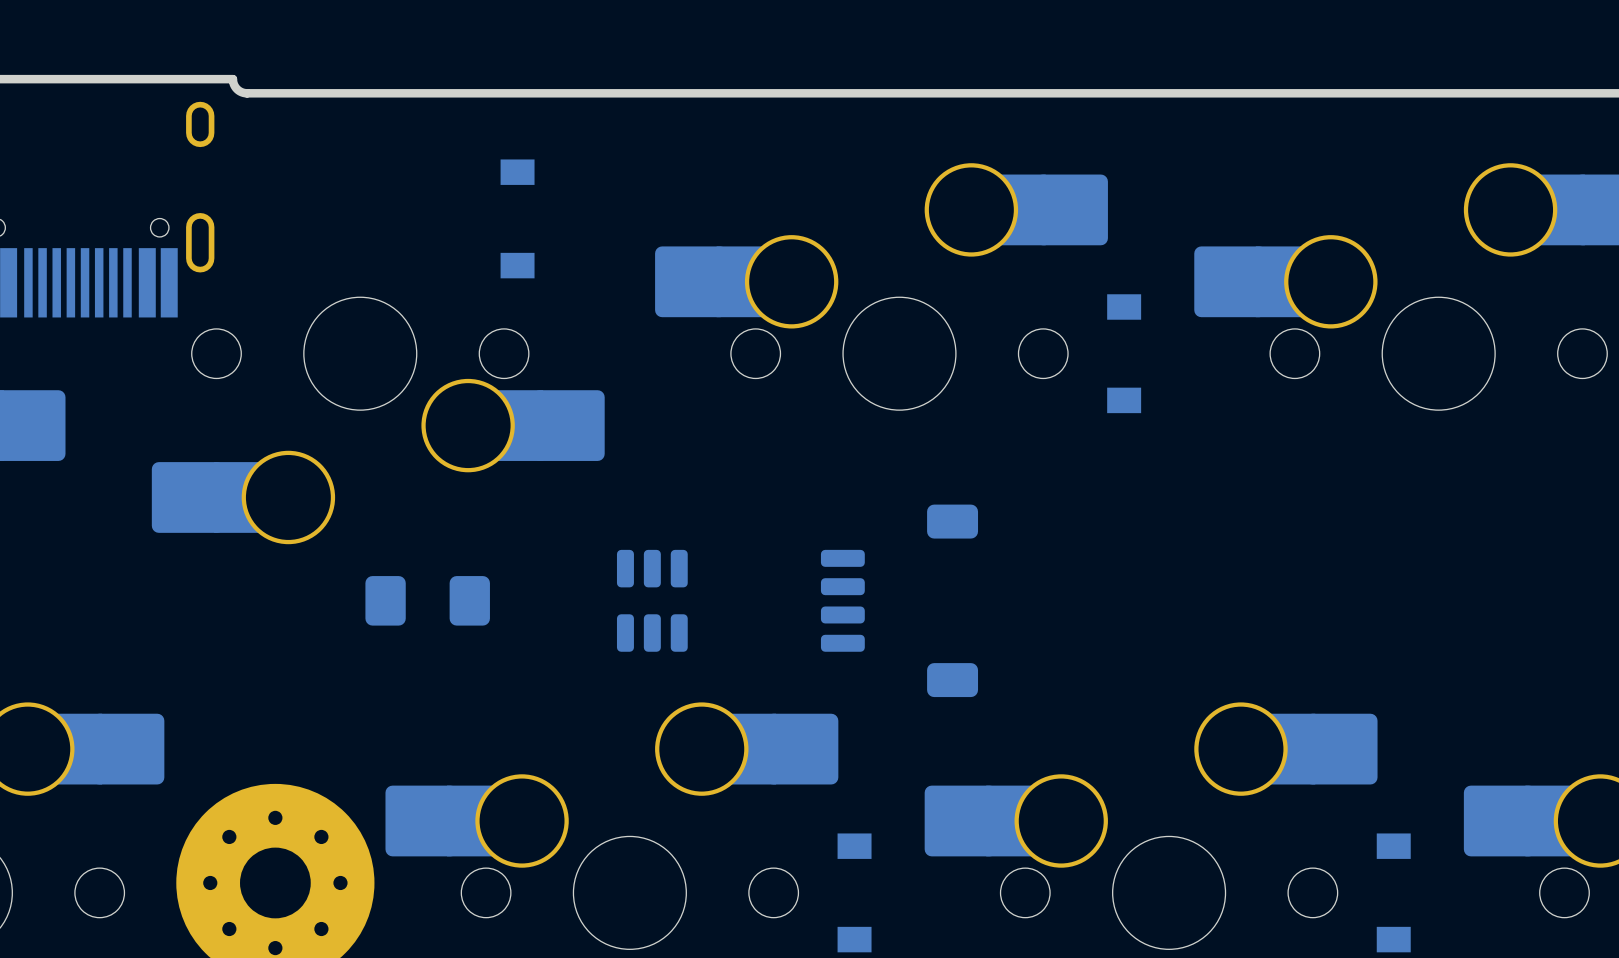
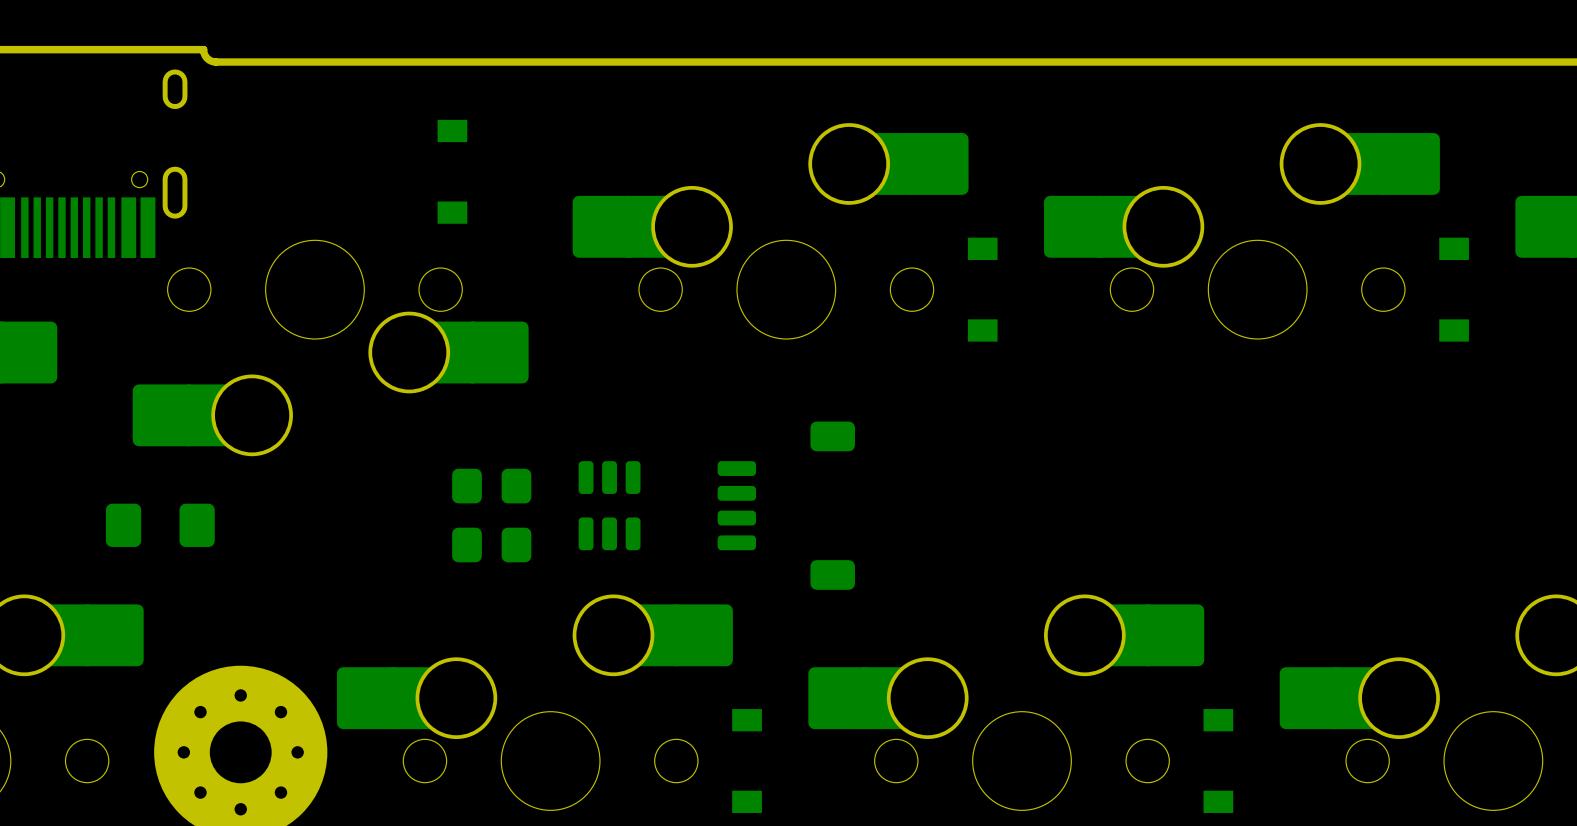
part: none -> (491, 486)
part position: (427, 600) -> (160, 525)
part position: (652, 600) -> (609, 505)
part: none -> (491, 544)

